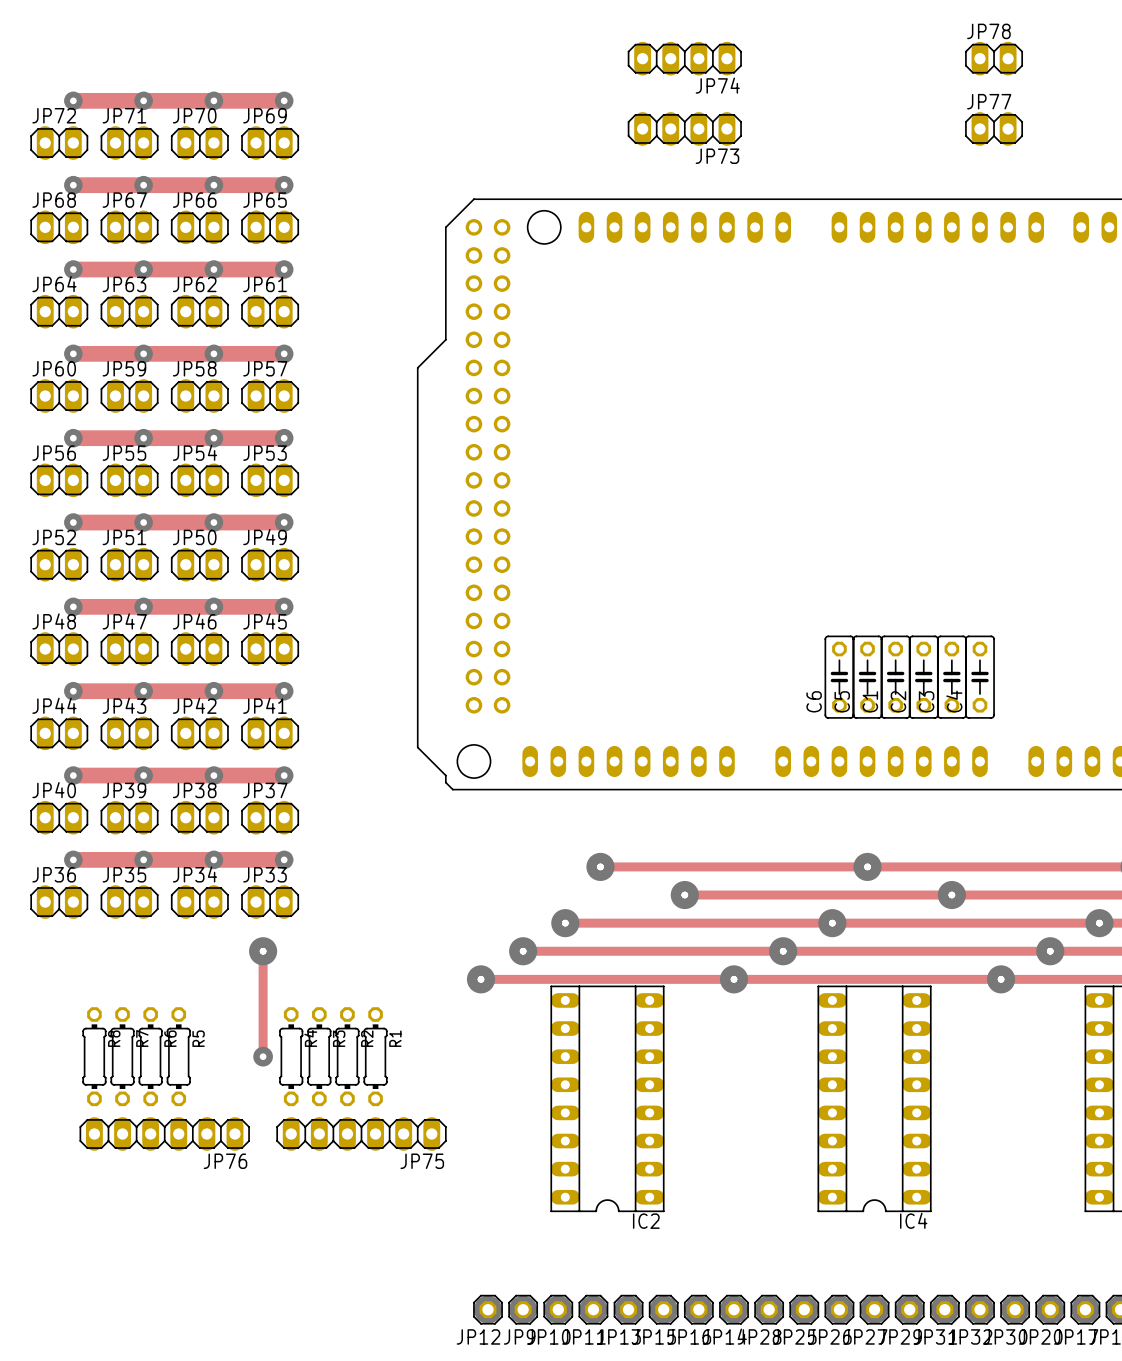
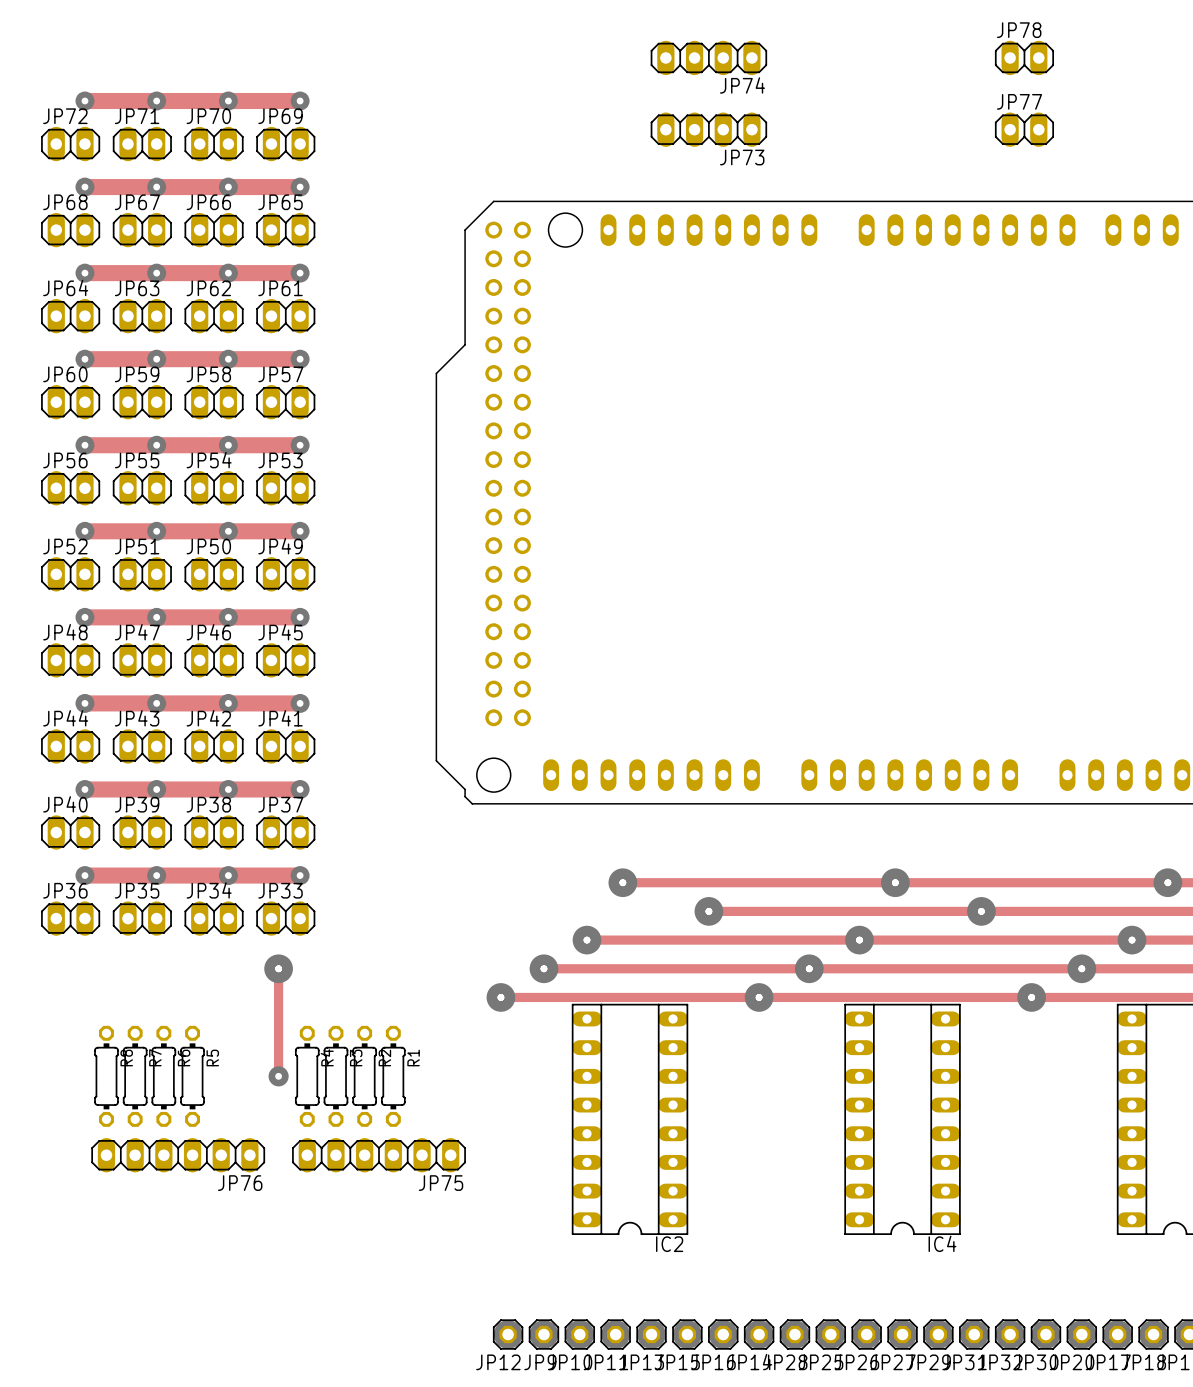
C6: (839, 677) -> none
C5: (867, 677) -> none
C1: (895, 677) -> none
C2: (923, 677) -> none
C3: (951, 677) -> none
C4: (979, 677) -> none

